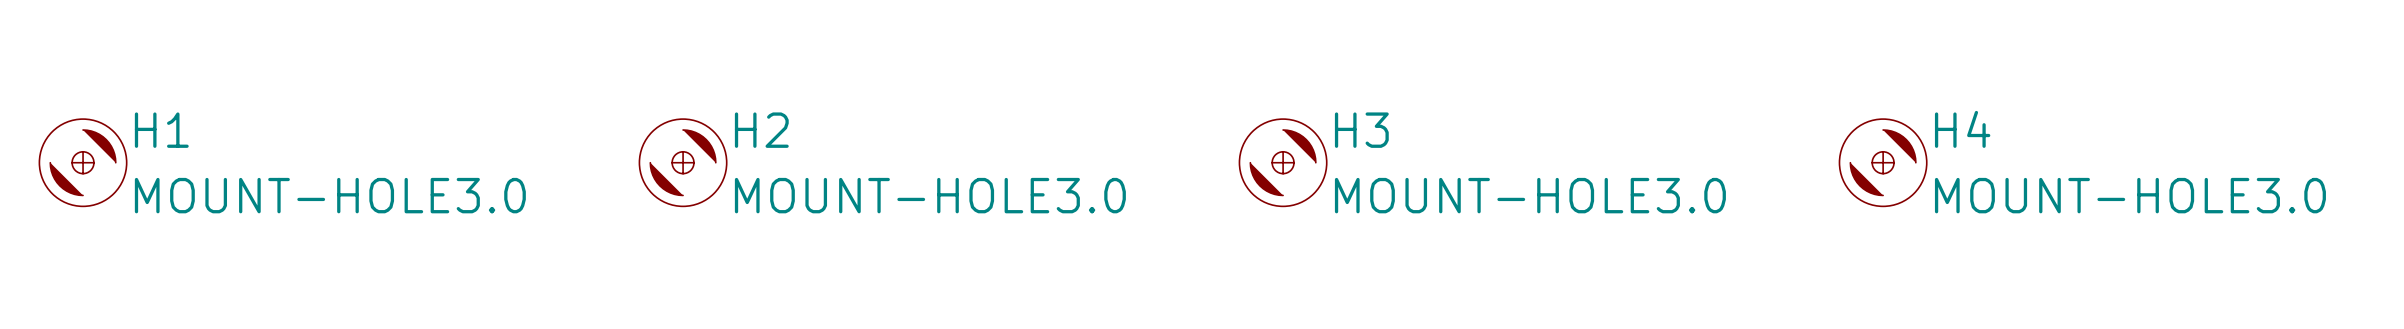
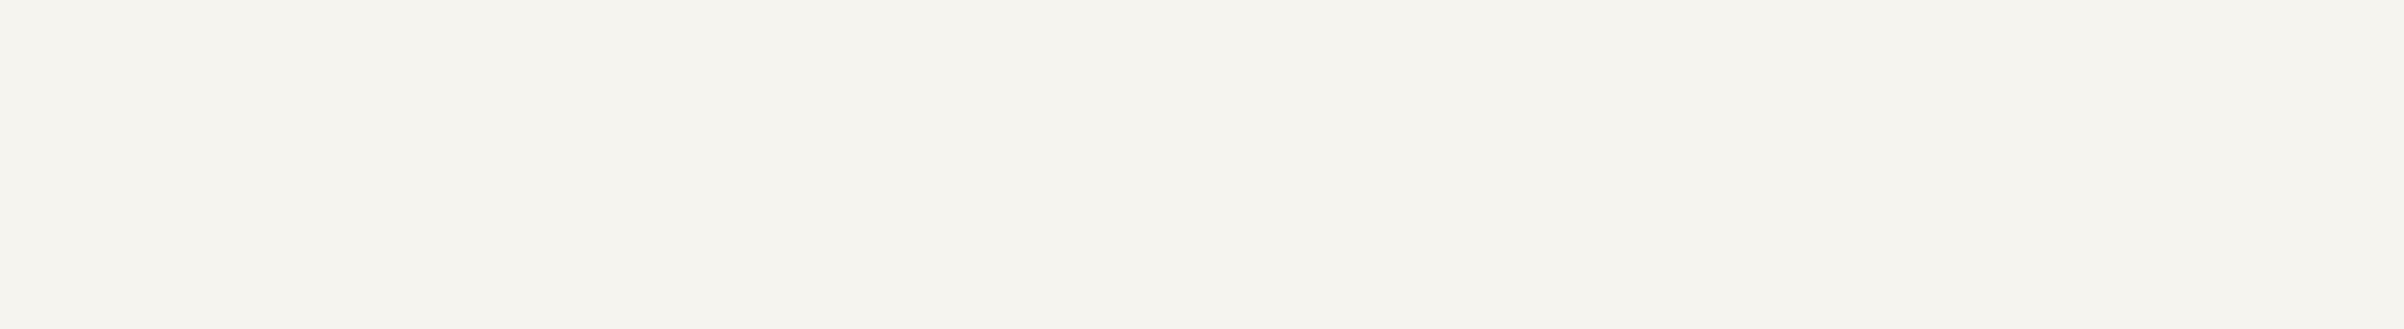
H1: MOUNT-HOLE3.0 (83, 162) -> none
H2: MOUNT-HOLE3.0 (683, 162) -> none
H3: MOUNT-HOLE3.0 (1283, 162) -> none
H4: MOUNT-HOLE3.0 (1883, 162) -> none

